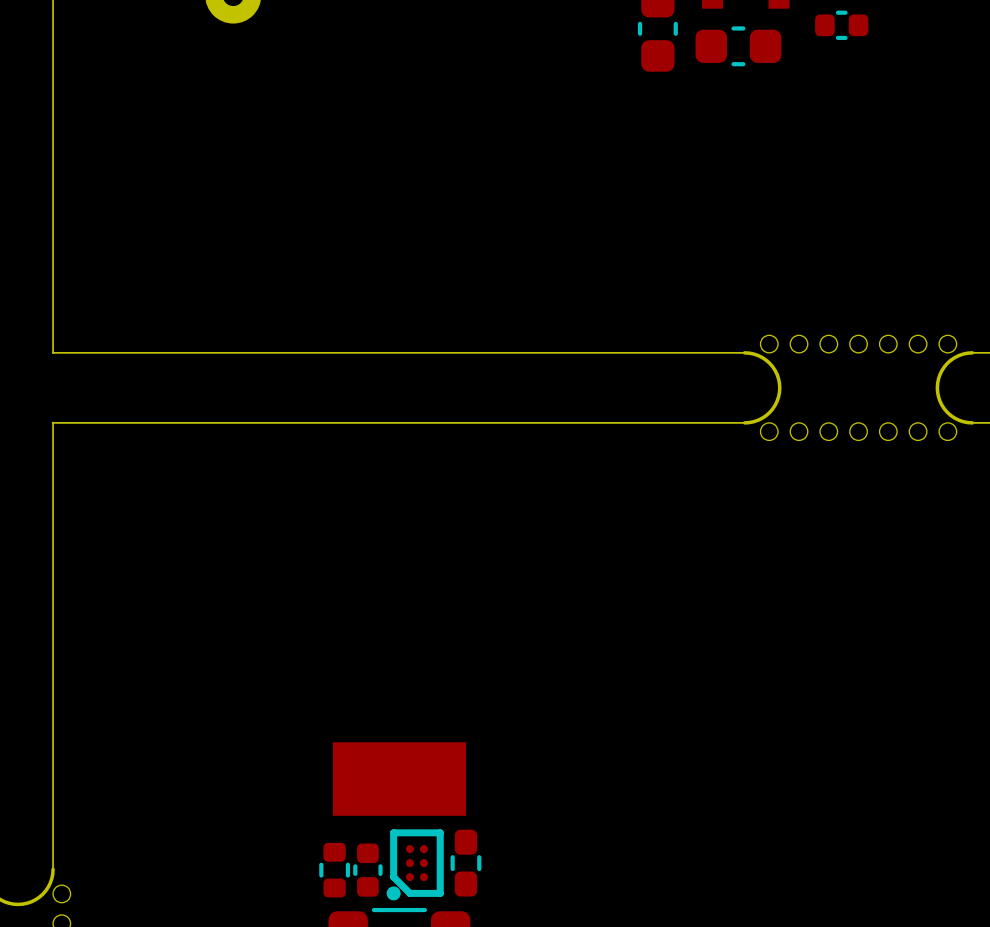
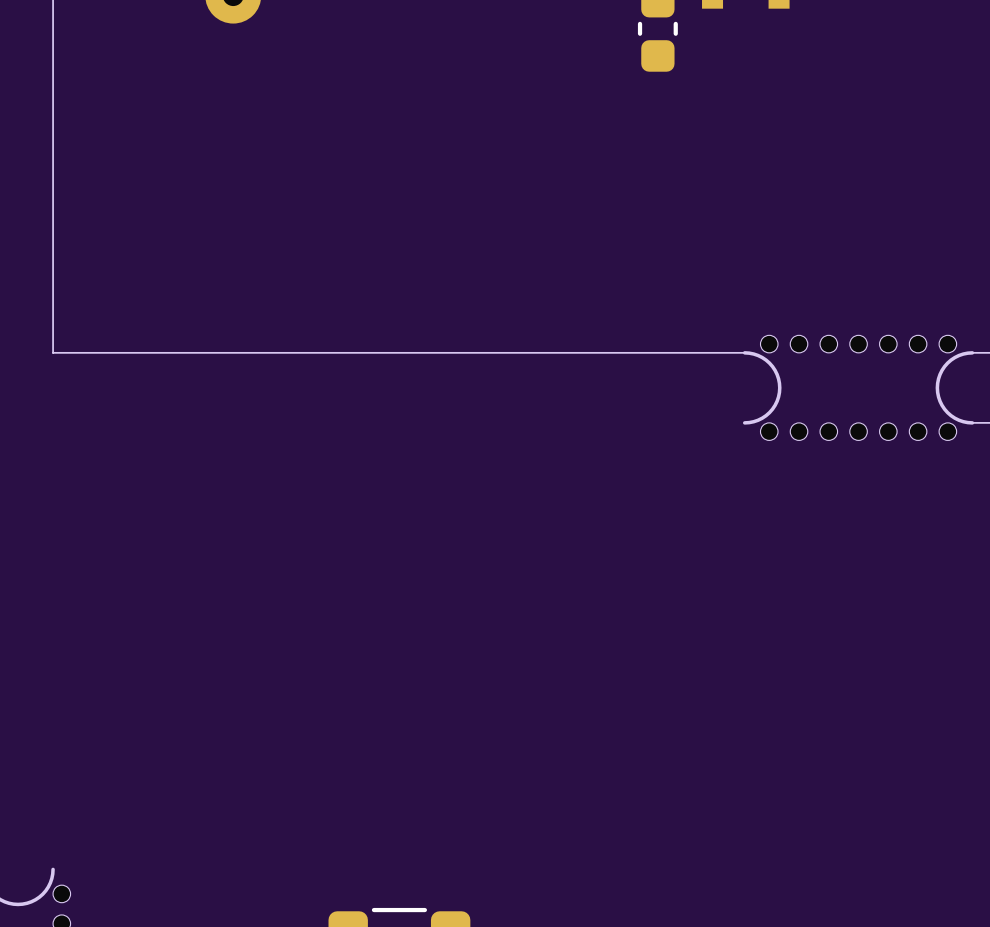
part: (841, 25) -> none
part: (738, 46) -> none
board edge: (744, 422) (53, 422) (53, 869) -> none
part: (399, 779) -> none
part: (465, 863) -> none
part: (415, 864) -> none
part: (334, 870) -> none
part: (367, 870) -> none

